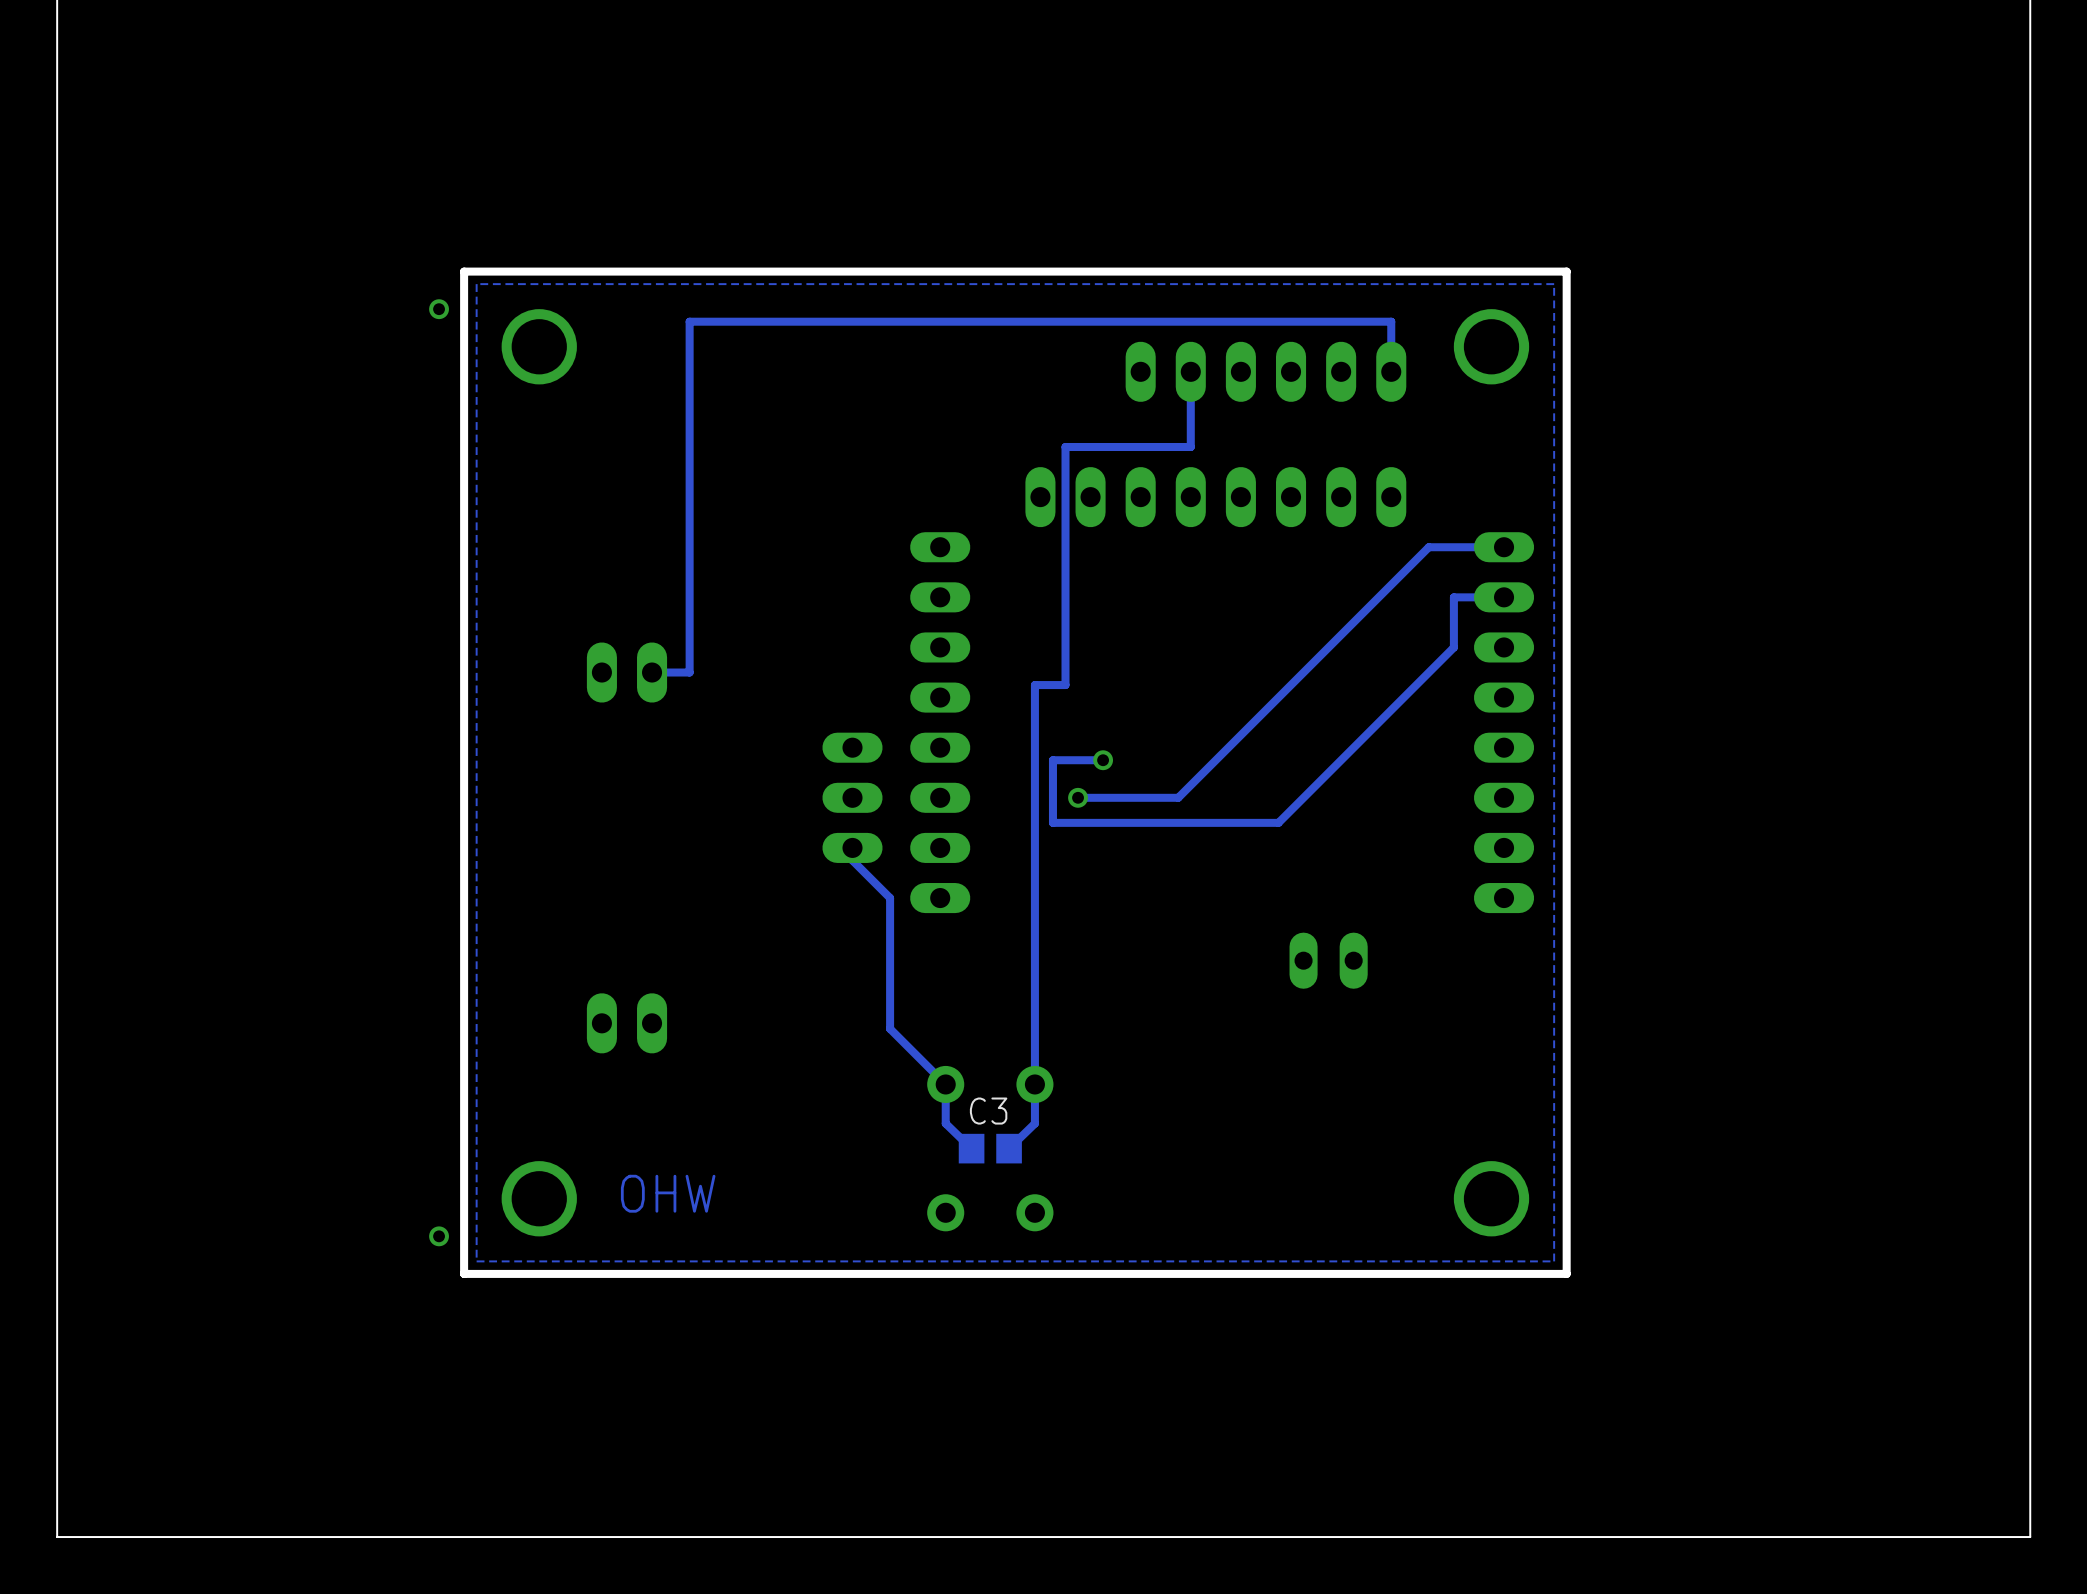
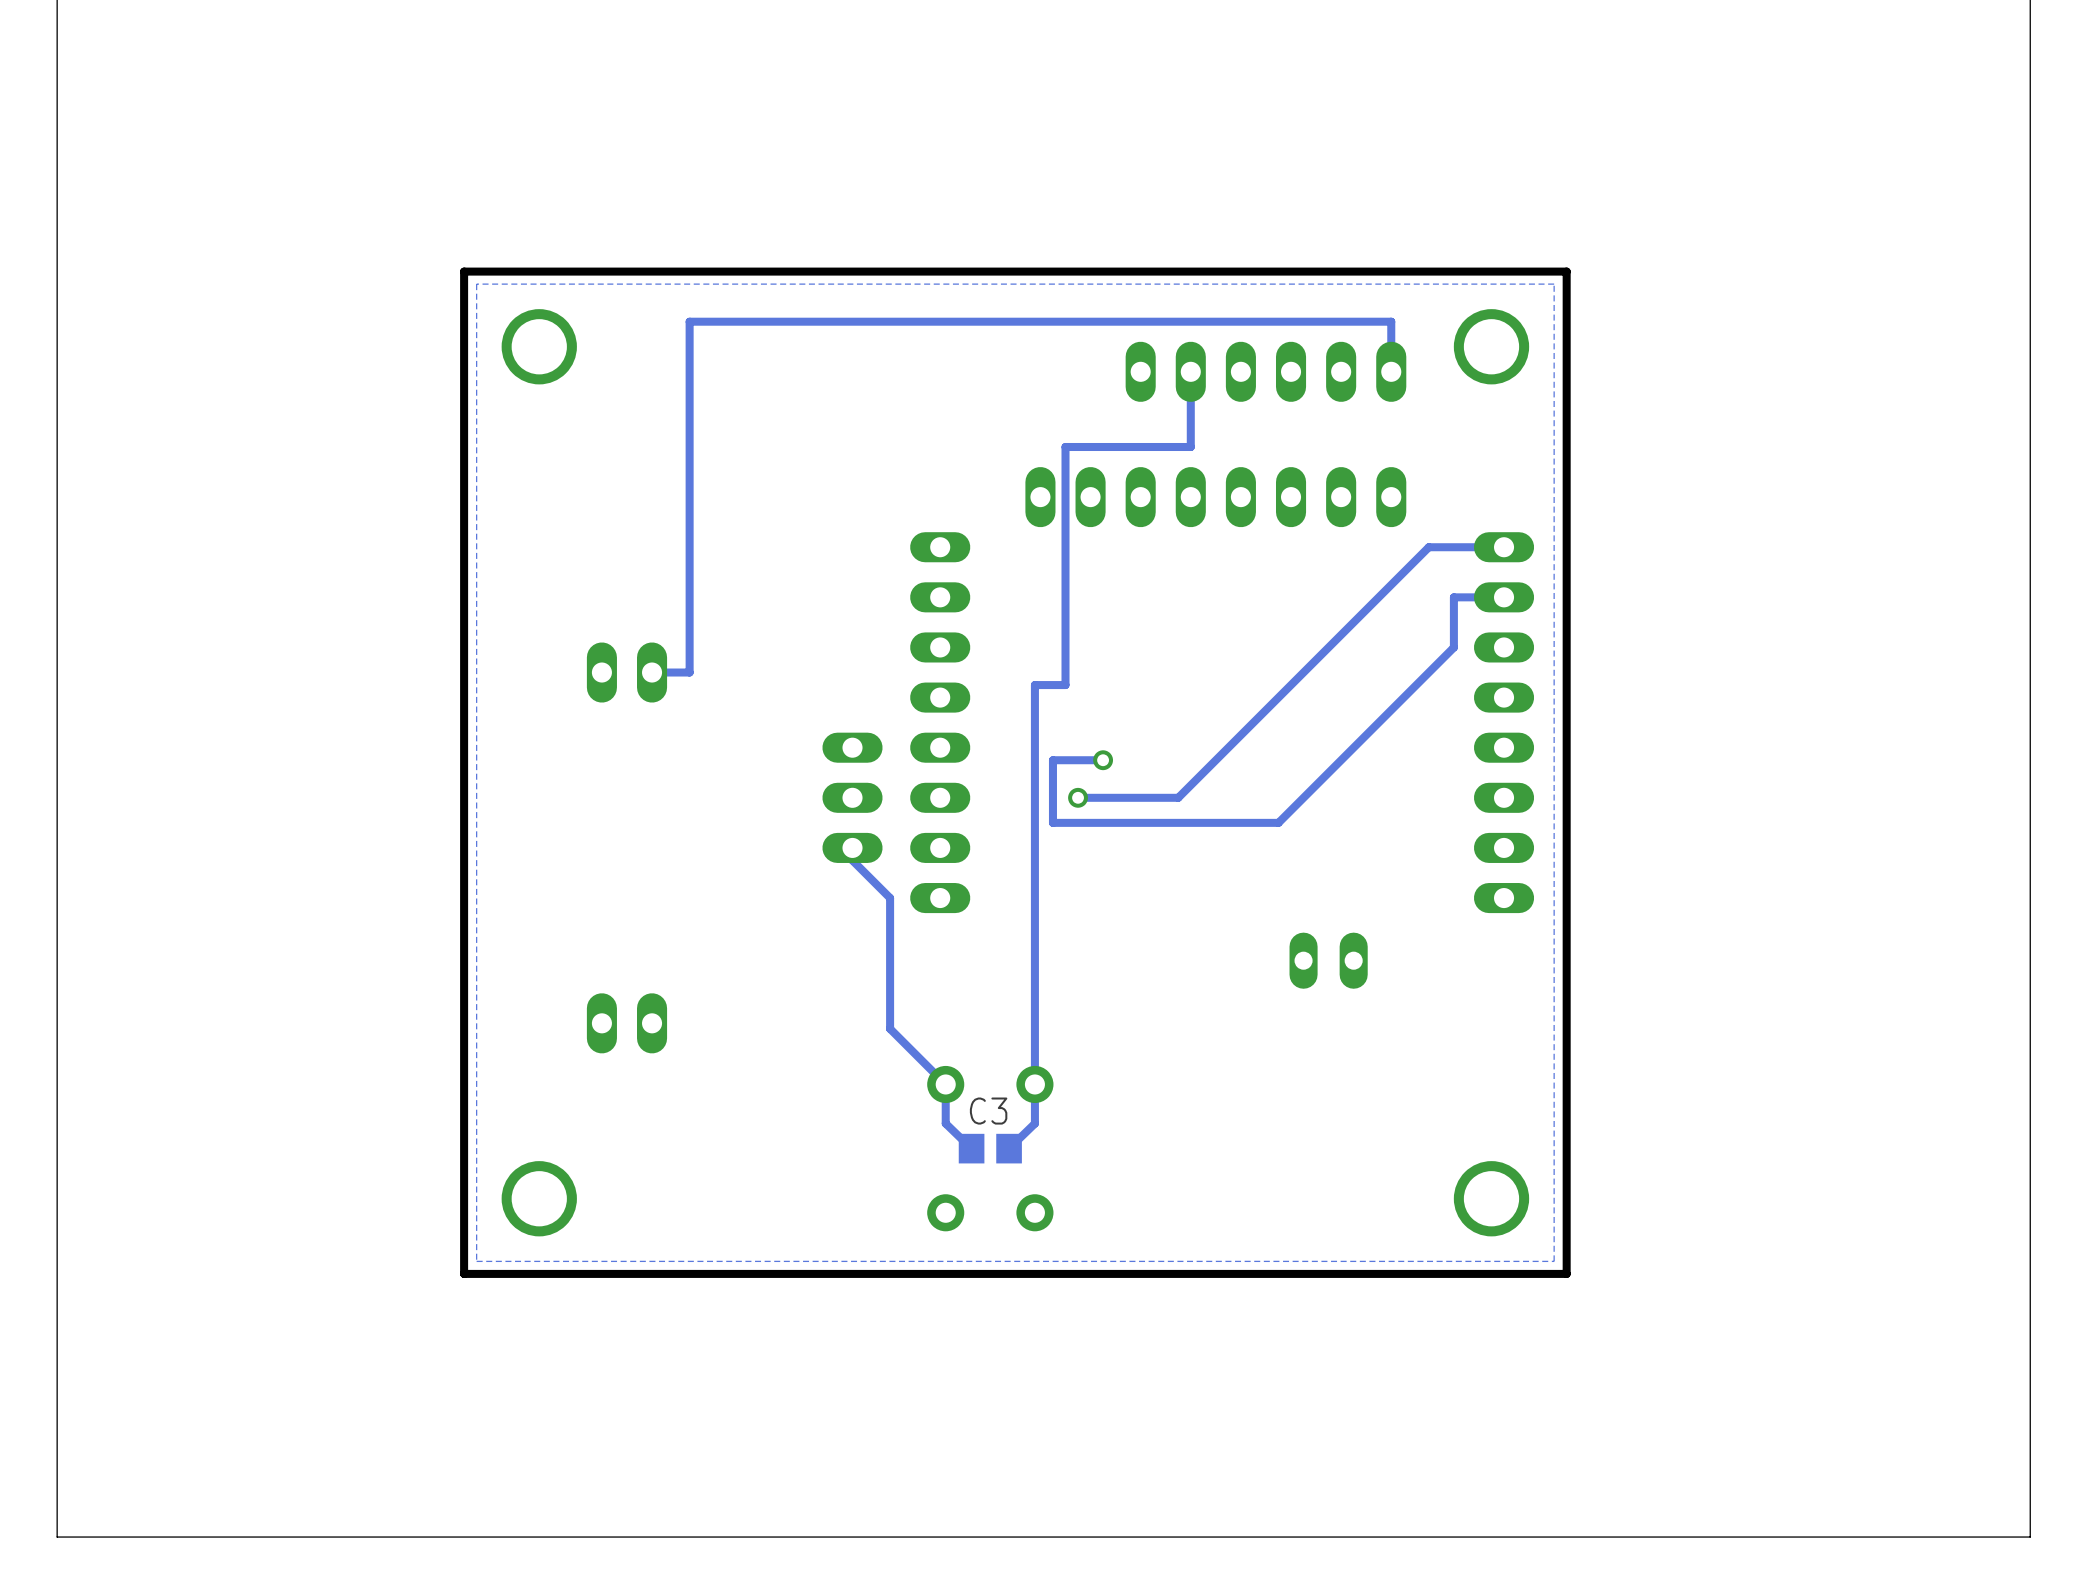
via: (439, 309) -> none
text: OHW (668, 1193) -> none
via: (439, 1236) -> none

